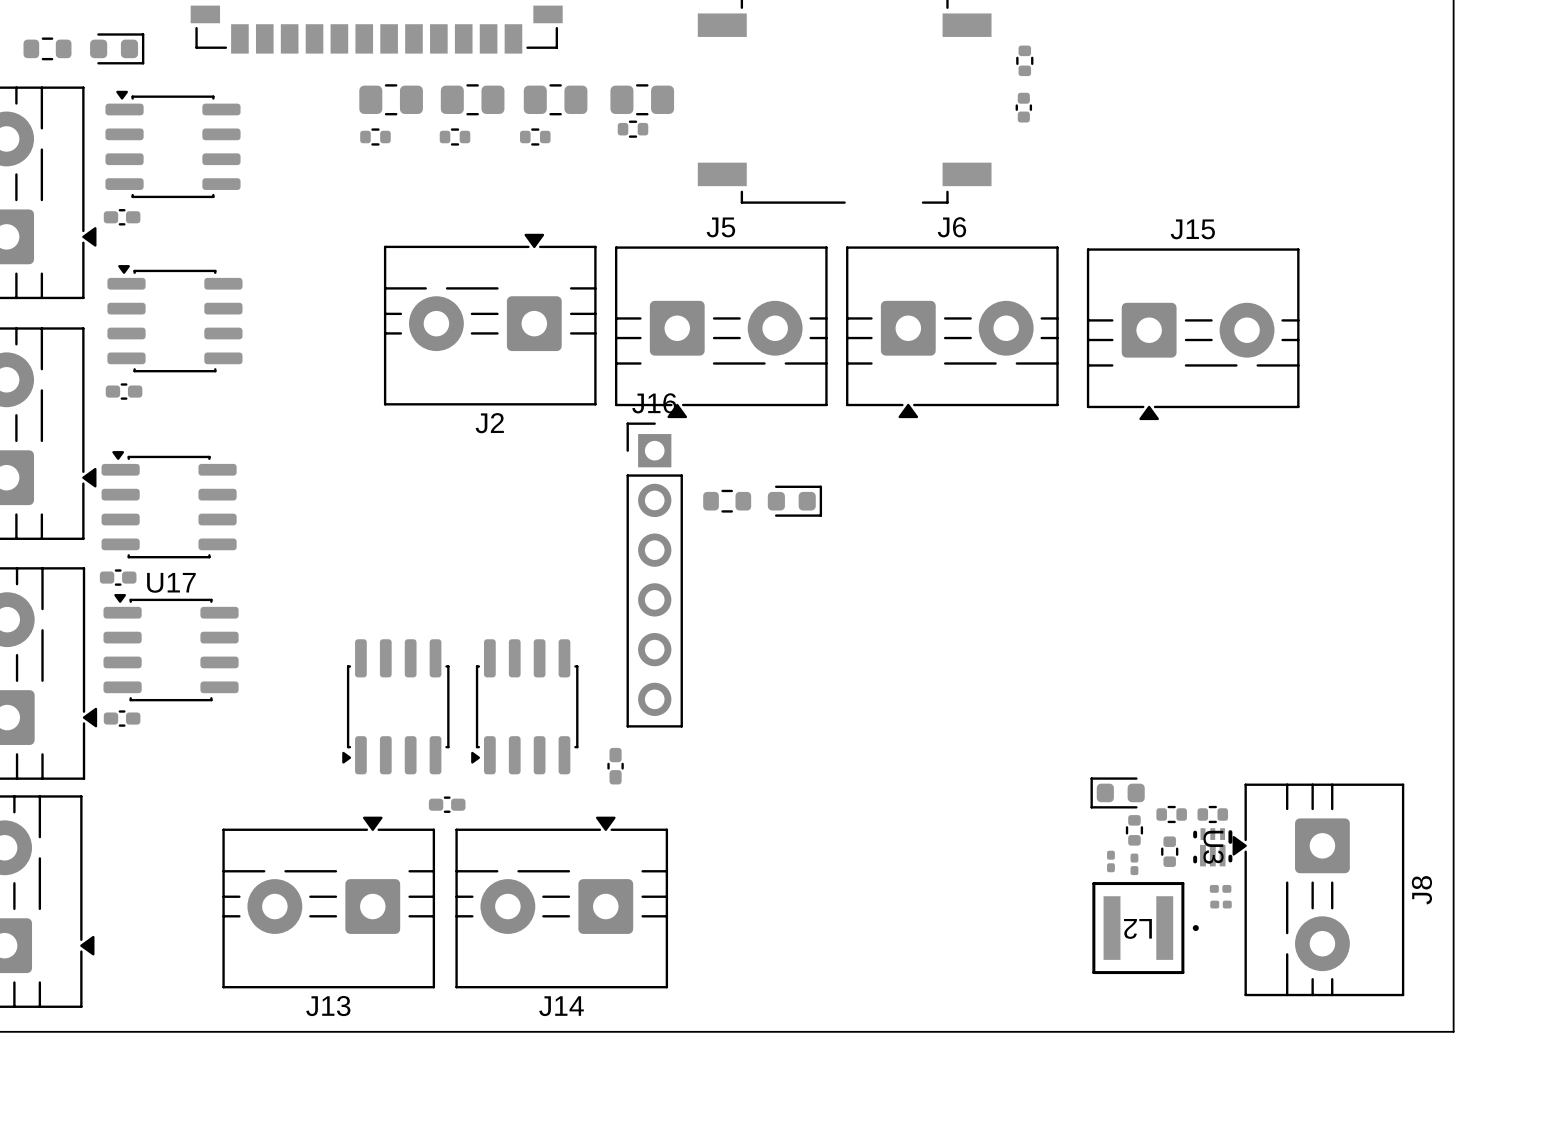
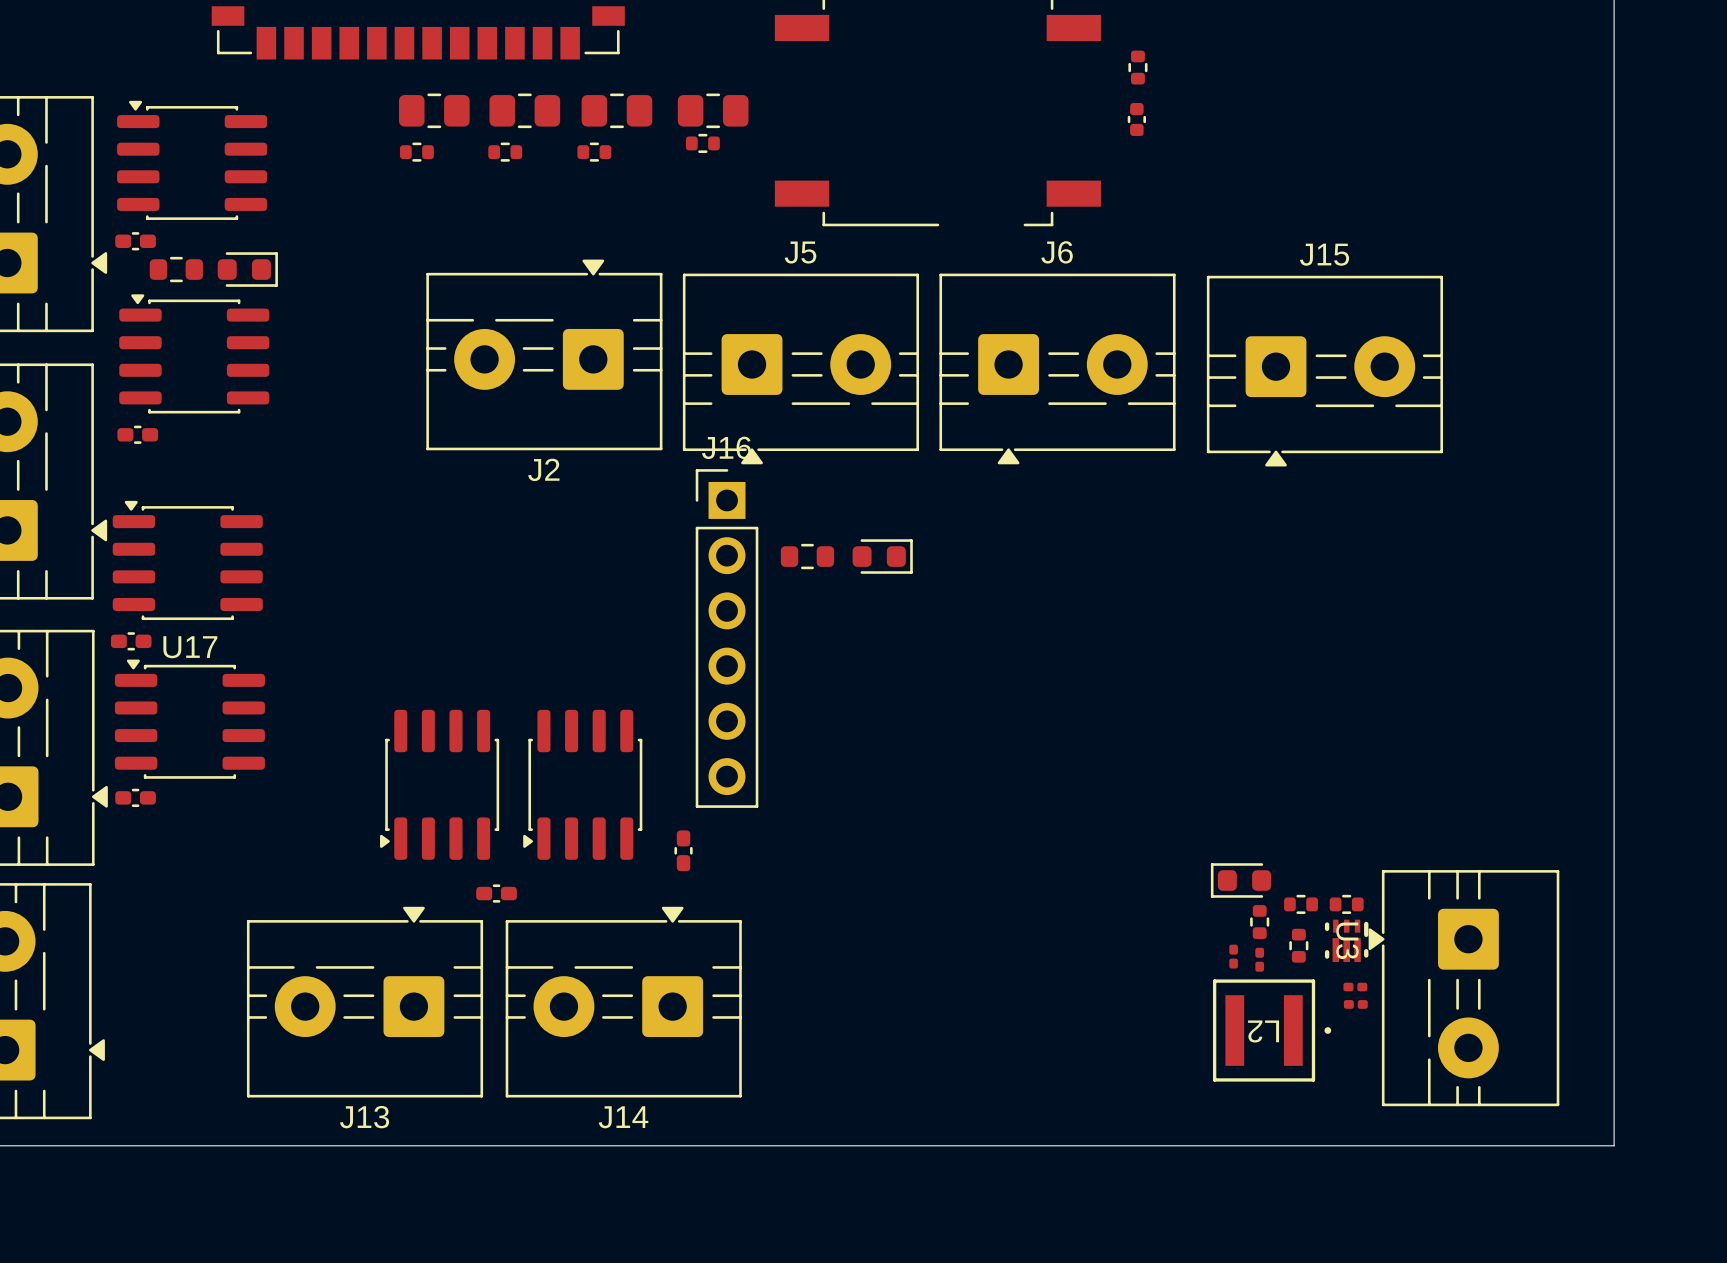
part position: (47, 48) -> (176, 269)
part position: (117, 48) -> (247, 269)
J8 name: J8 (1421, 890) -> none

